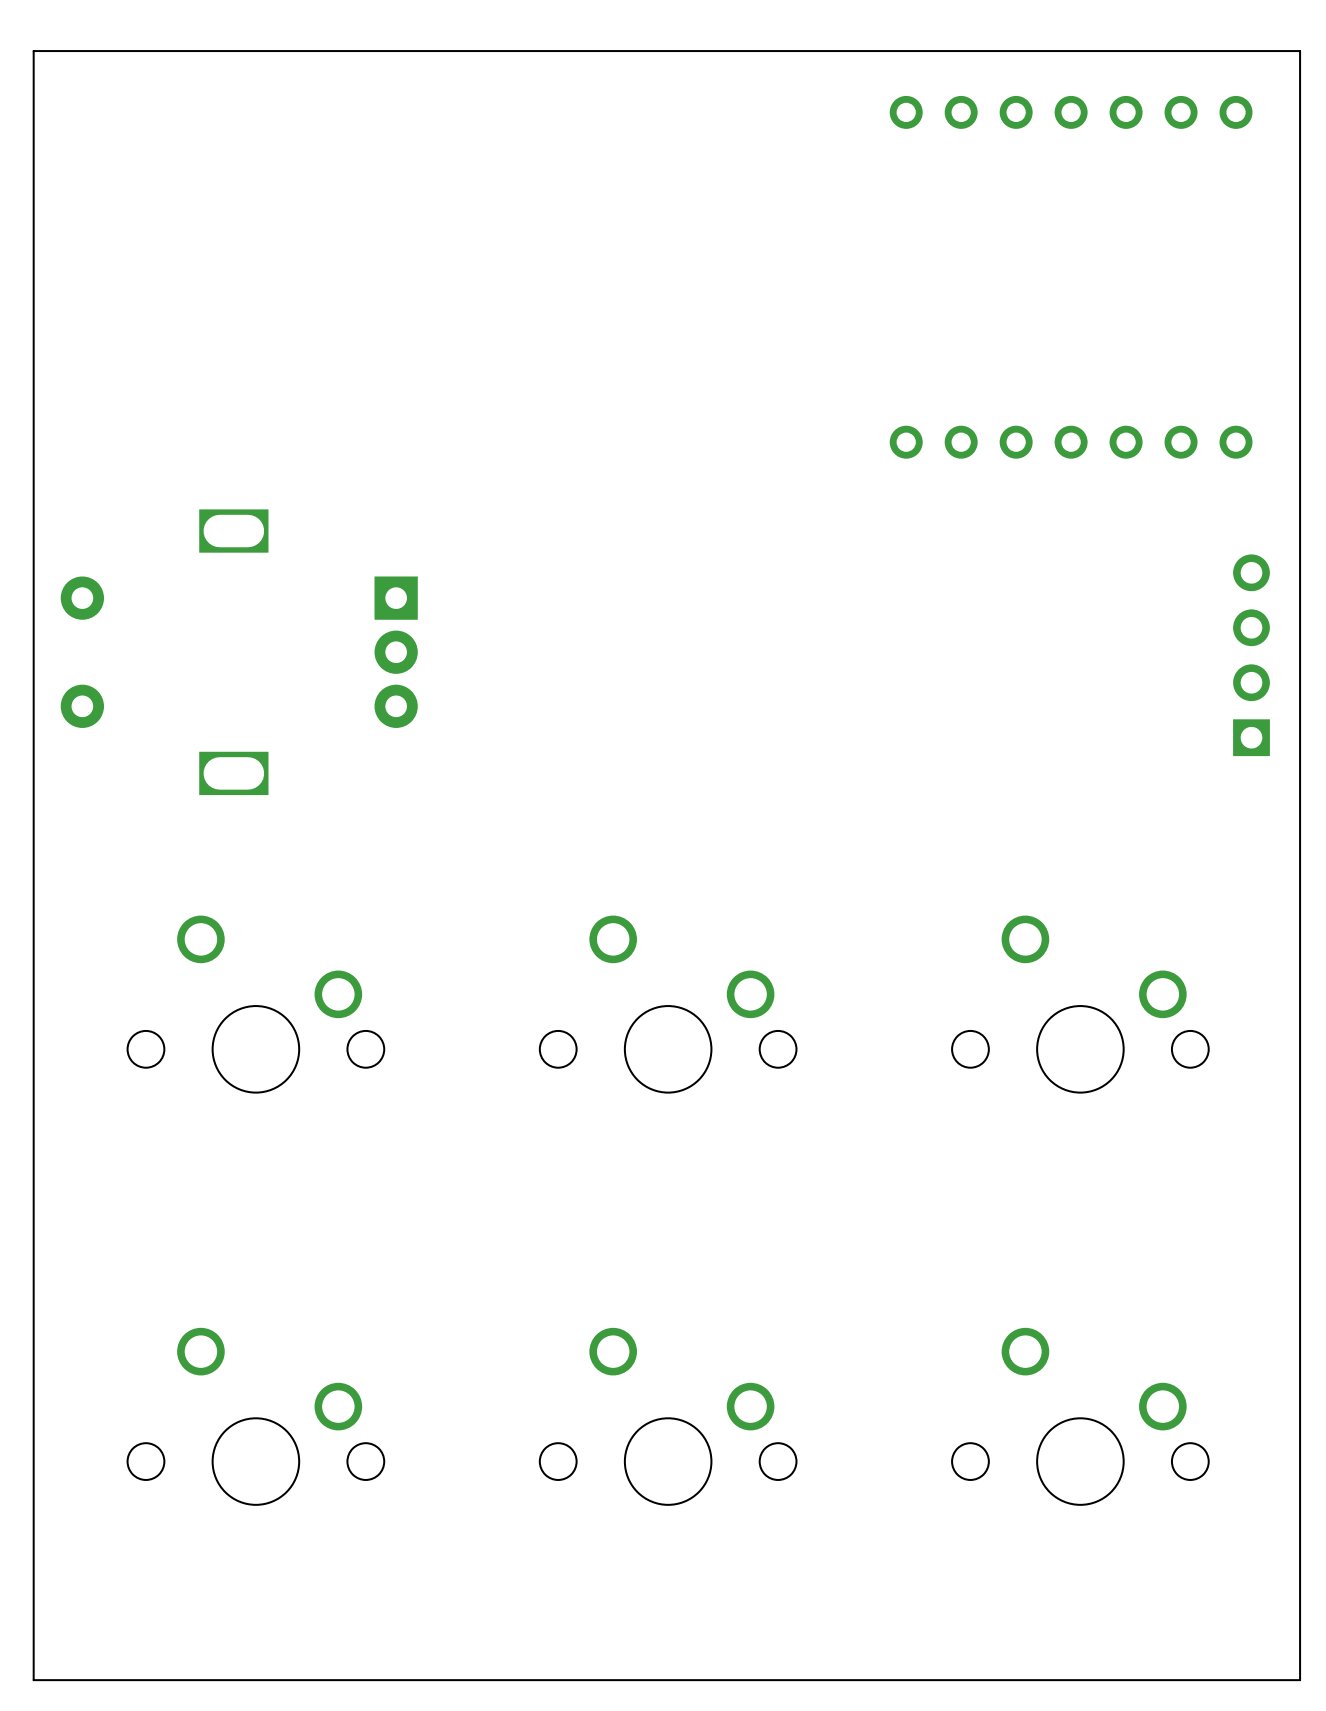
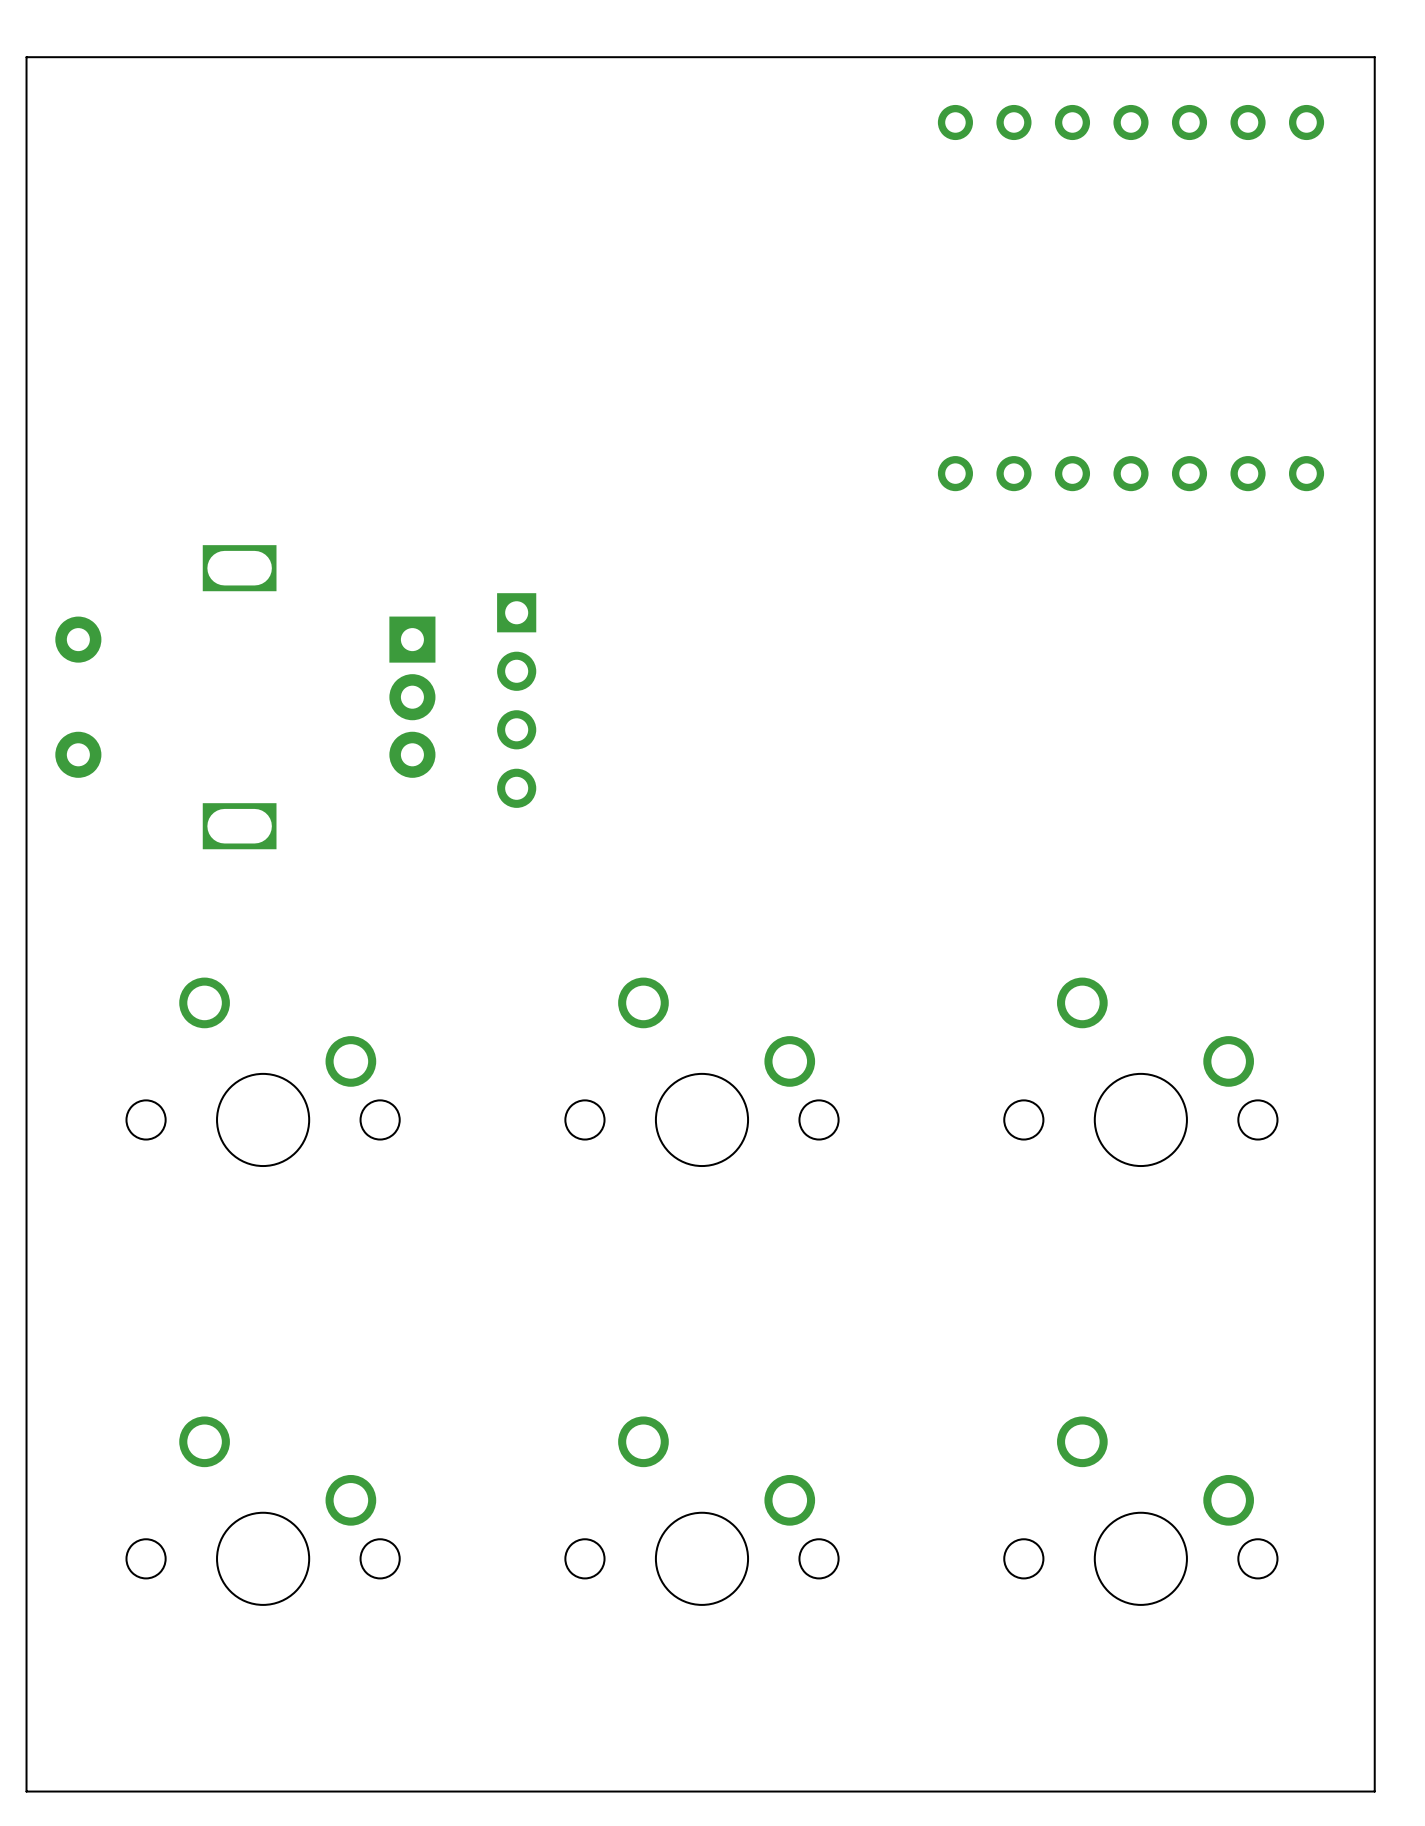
part: none -> (516, 700)
part: (1251, 655) -> none

